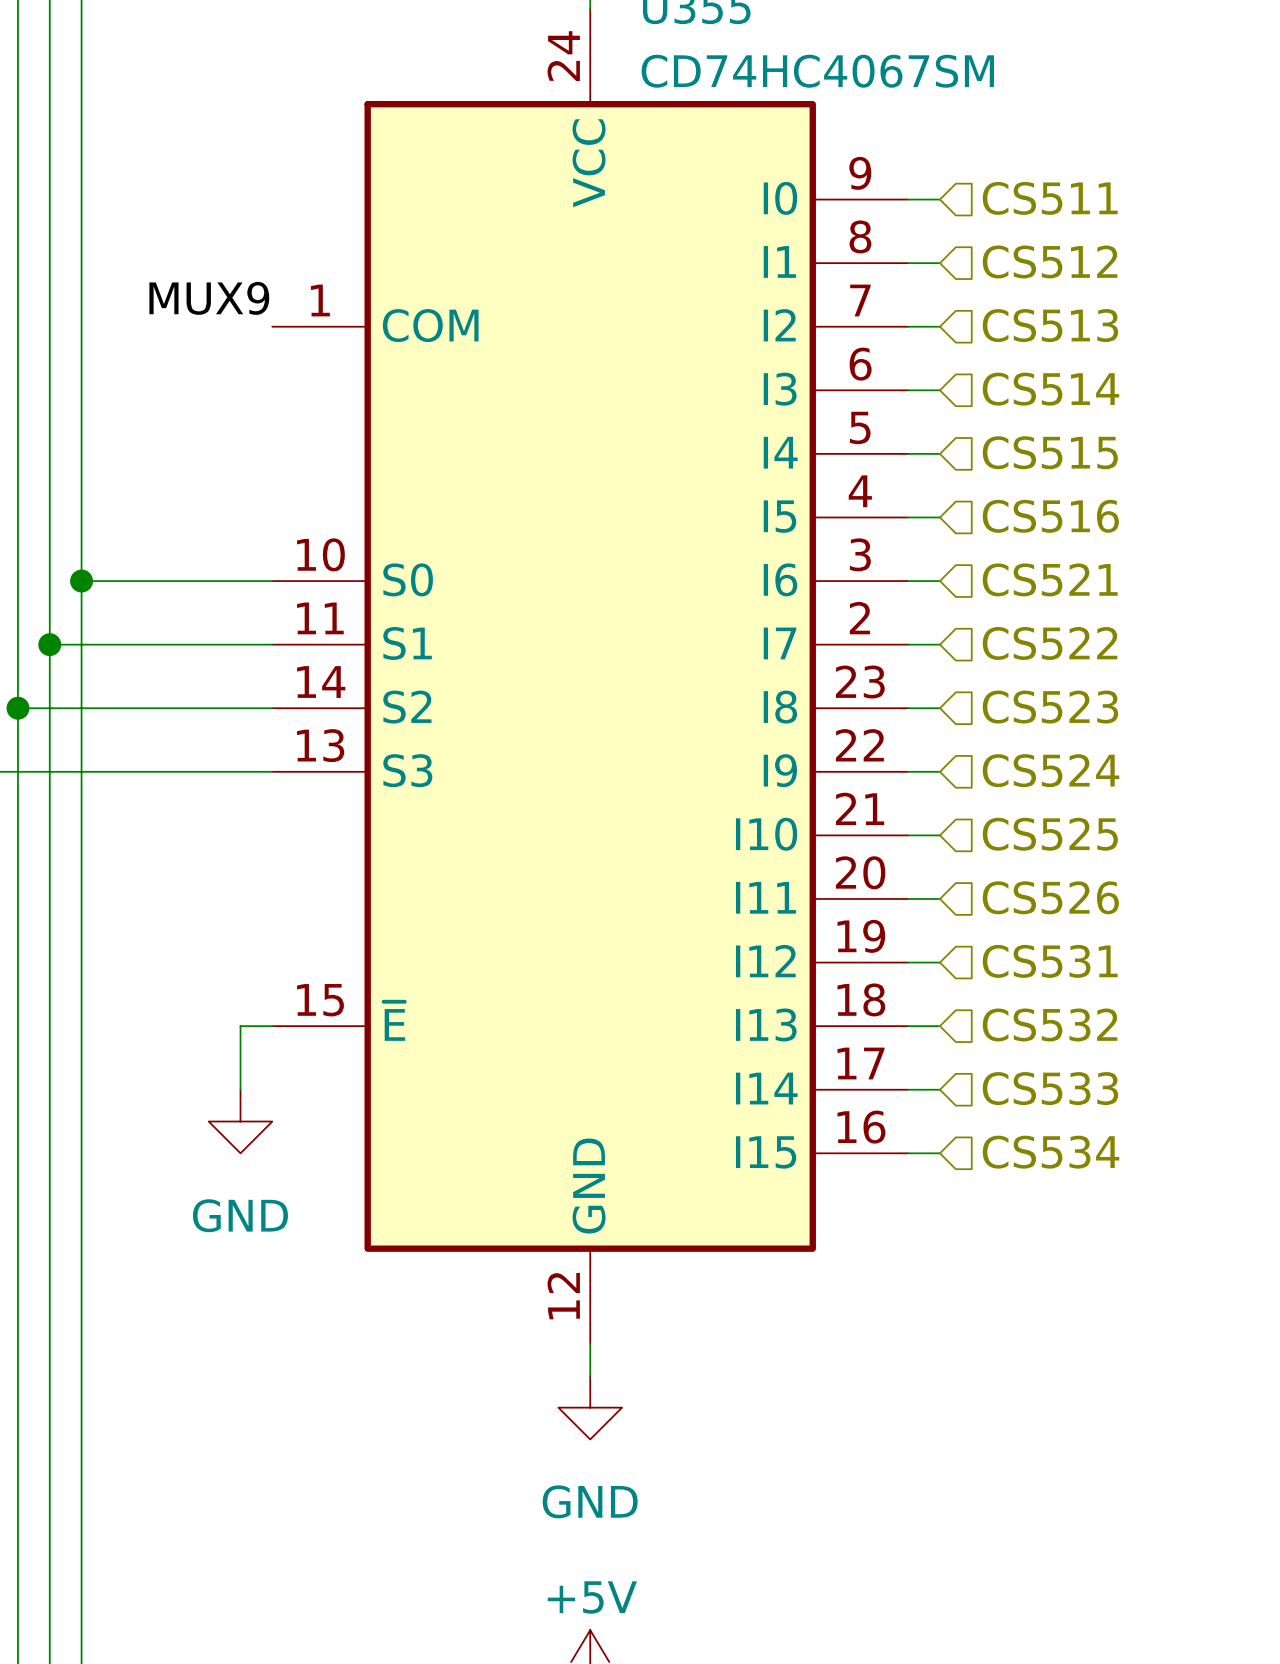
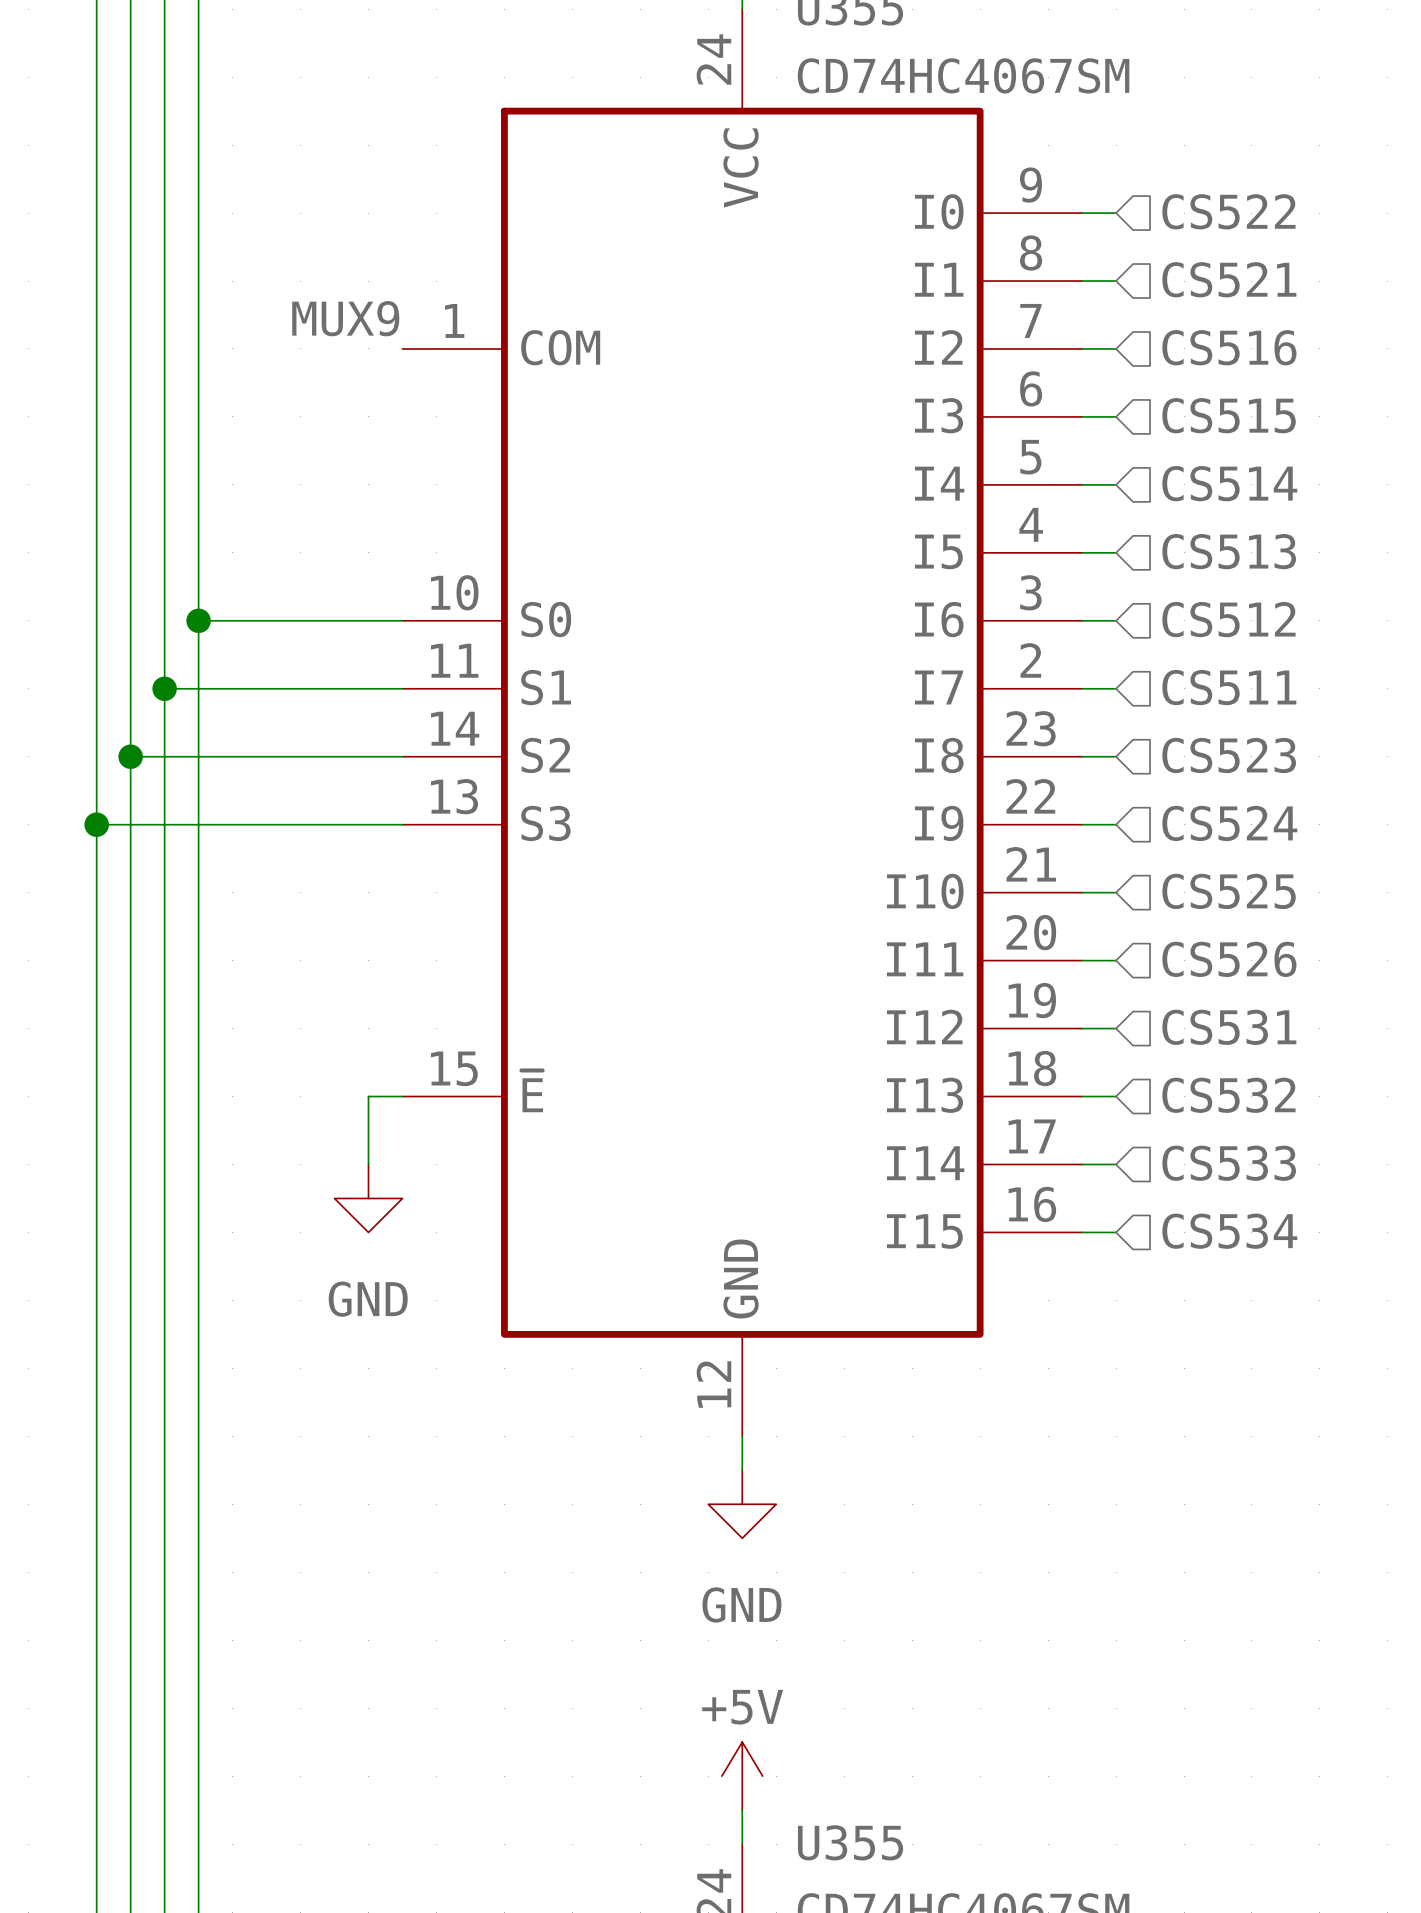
hierarchical label: CS511 (1050, 198) -> CS522 (1228, 211)
hierarchical label: CS512 (1050, 261) -> CS521 (1229, 279)
hierarchical label: CS513 (1050, 325) -> CS516 (1229, 347)
hierarchical label: CS514 (1051, 389) -> CS515 (1229, 415)
hierarchical label: CS515 (1050, 452) -> CS514 (1229, 483)
hierarchical label: CS516 (1050, 516) -> CS513 (1229, 551)
hierarchical label: CS521 (1050, 579) -> CS512 (1228, 619)
hierarchical label: CS522 (1050, 643) -> CS511 (1229, 687)

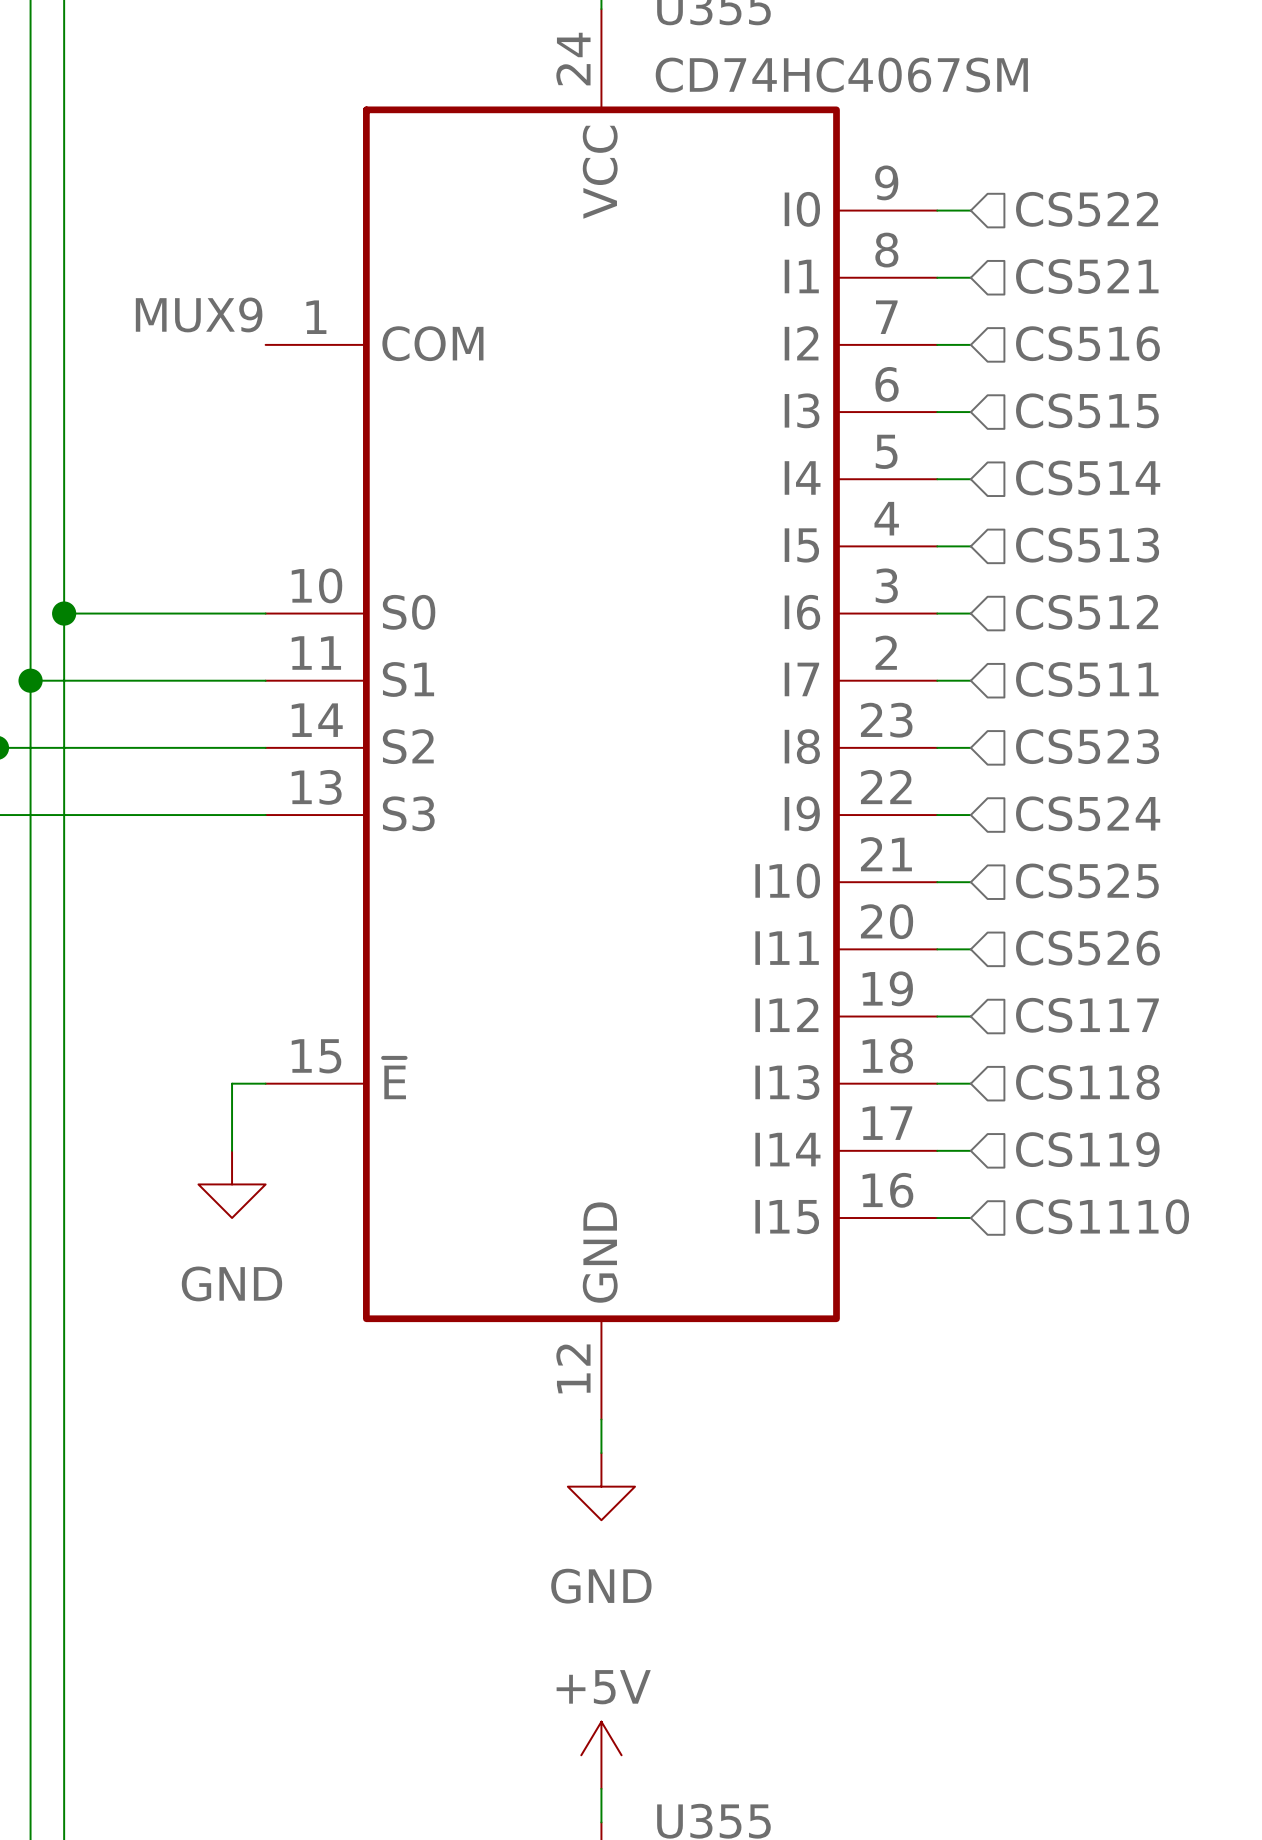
hierarchical label: CS531 (1229, 1027) -> CS117 (1087, 1015)
hierarchical label: CS532 (1228, 1095) -> CS118 (1087, 1082)
hierarchical label: CS533 (1229, 1163) -> CS119 (1087, 1149)
hierarchical label: CS534 (1229, 1231) -> CS1110 (1102, 1216)

